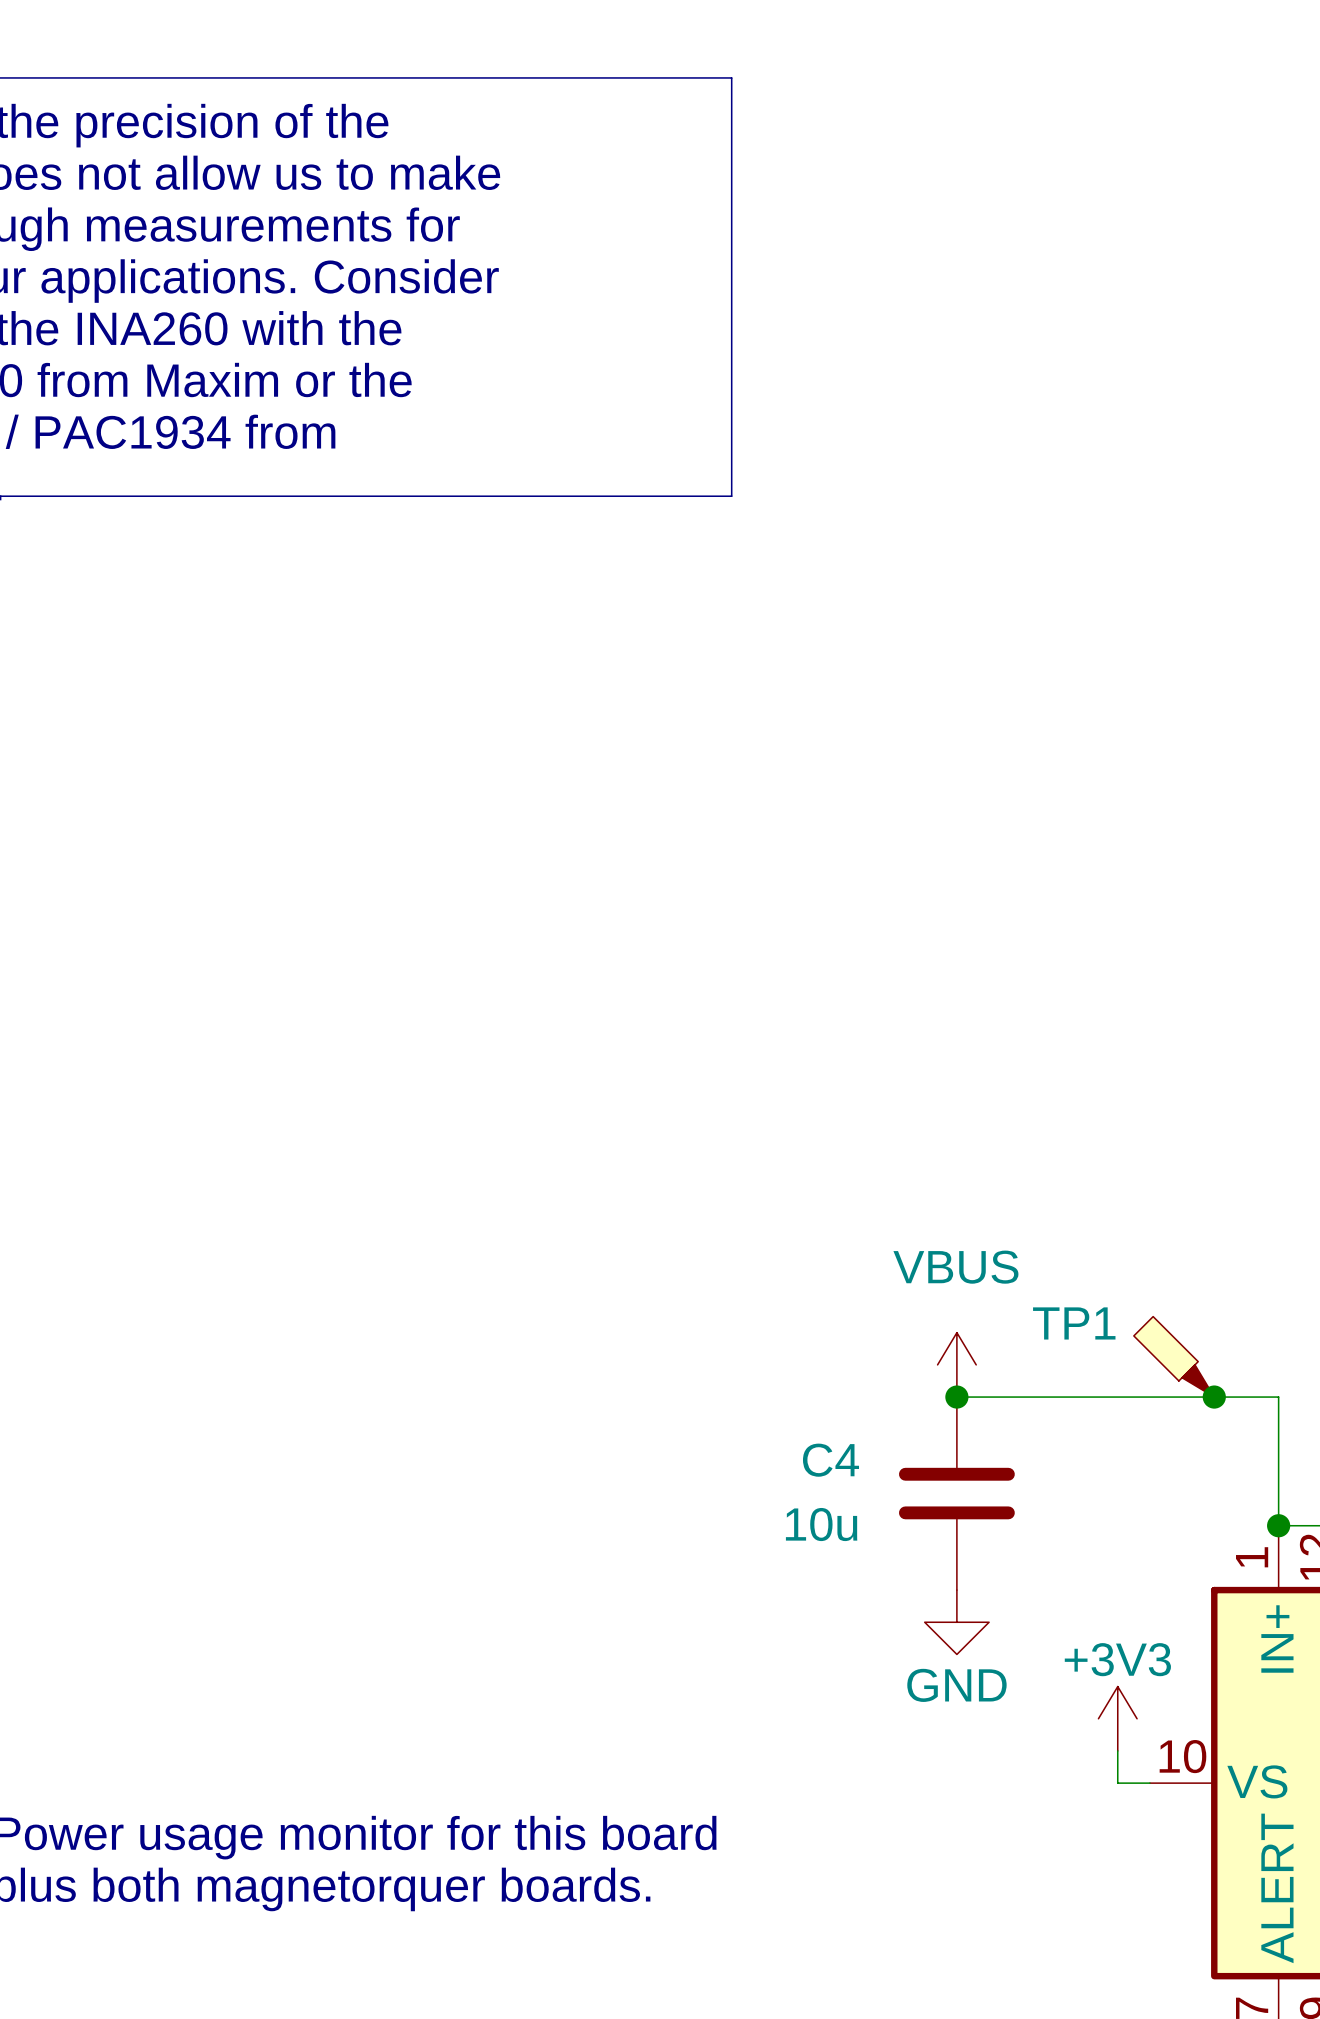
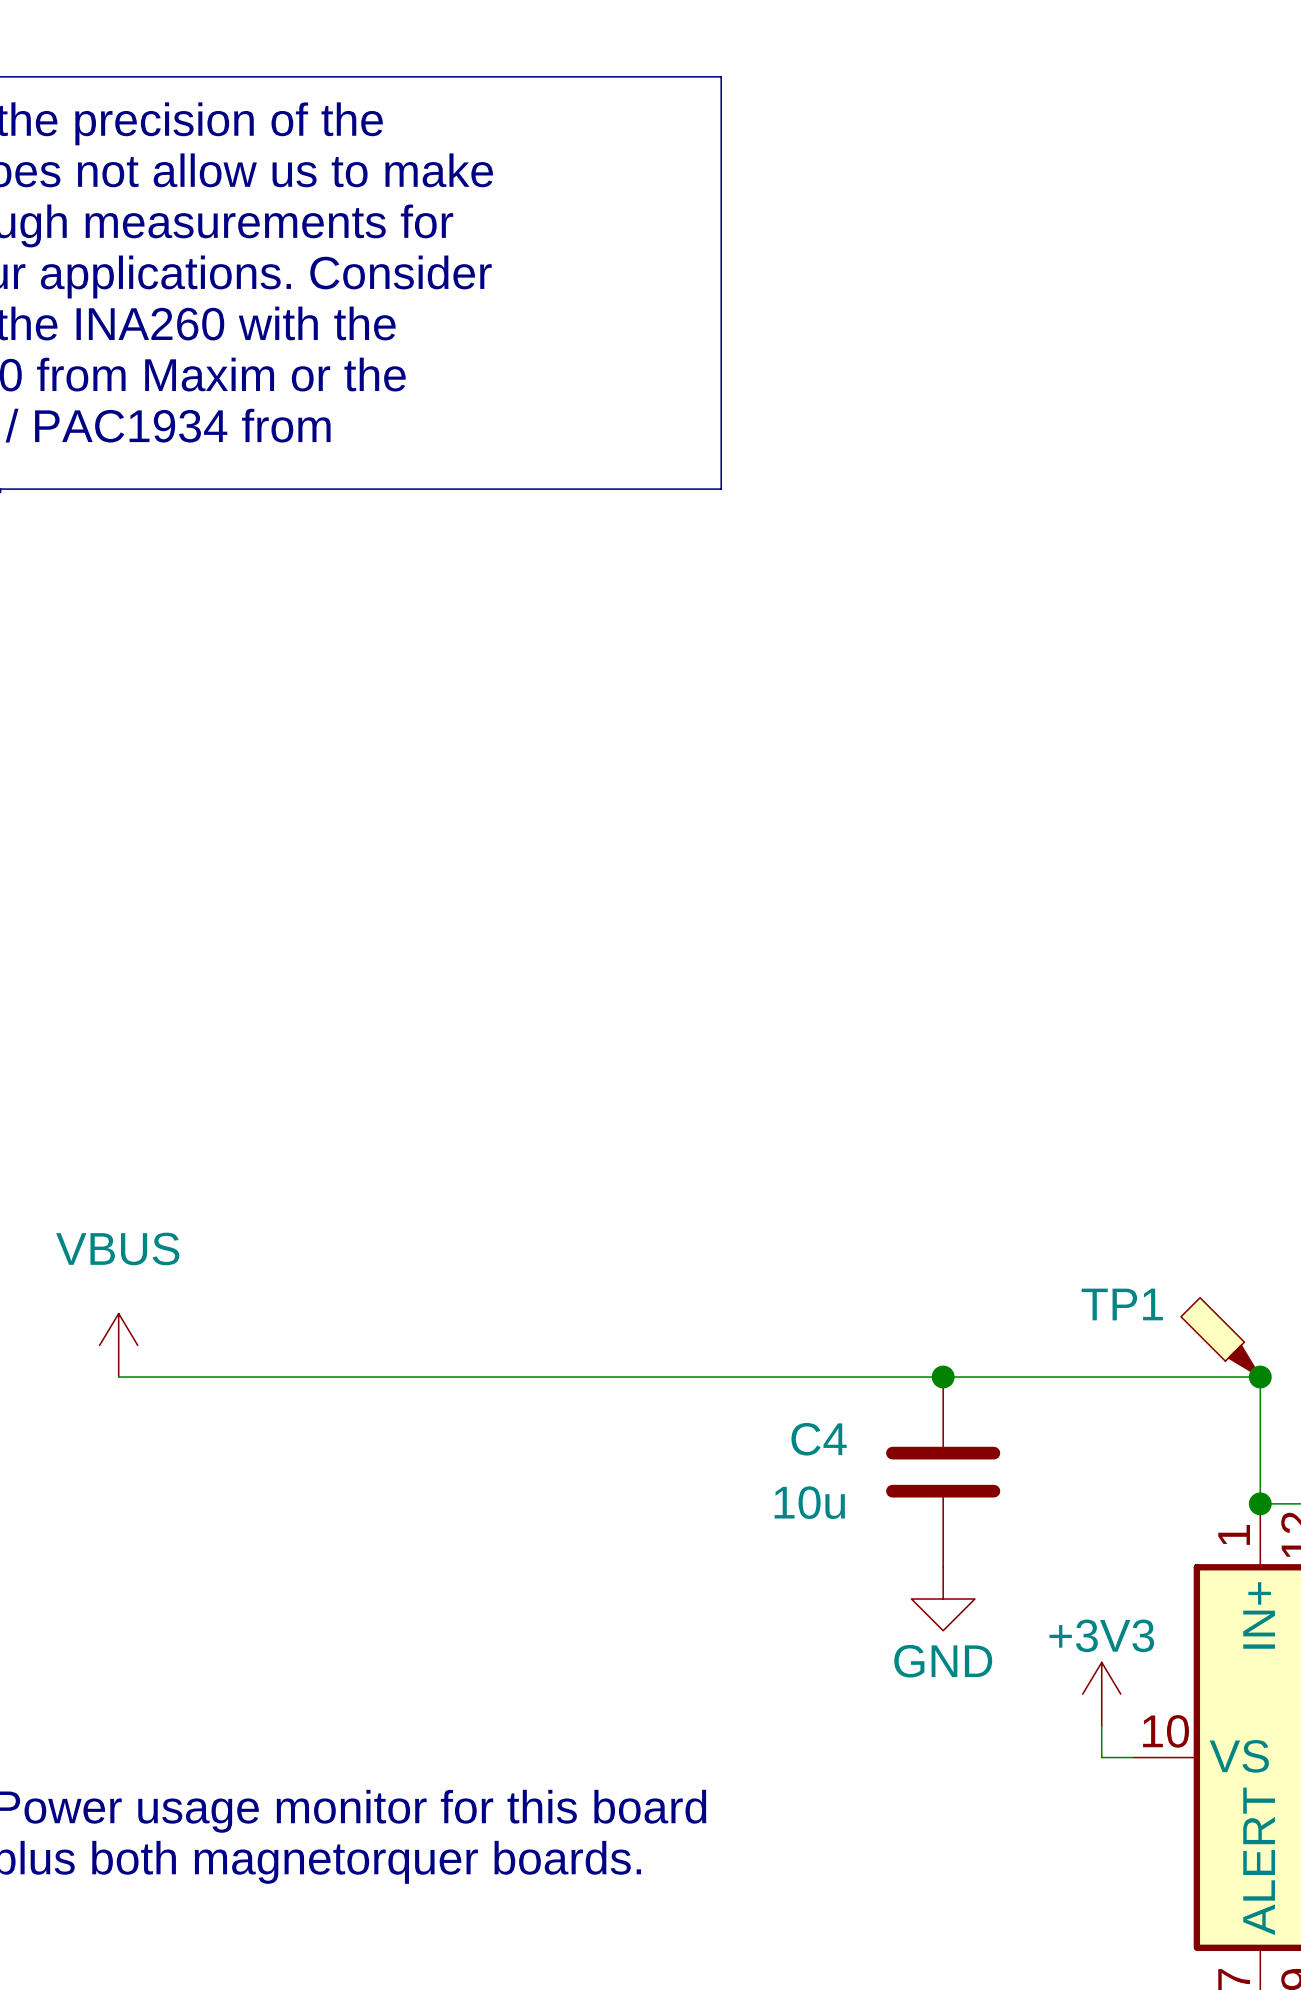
TP1 position: (1174, 1356) -> (1220, 1337)
power symbol: none -> VBUS (118, 1345)
power symbol: VBUS (956, 1364) -> none
wire: none -> (118, 1377) (943, 1377)
junction position: (1214, 1397) -> (1260, 1377)

